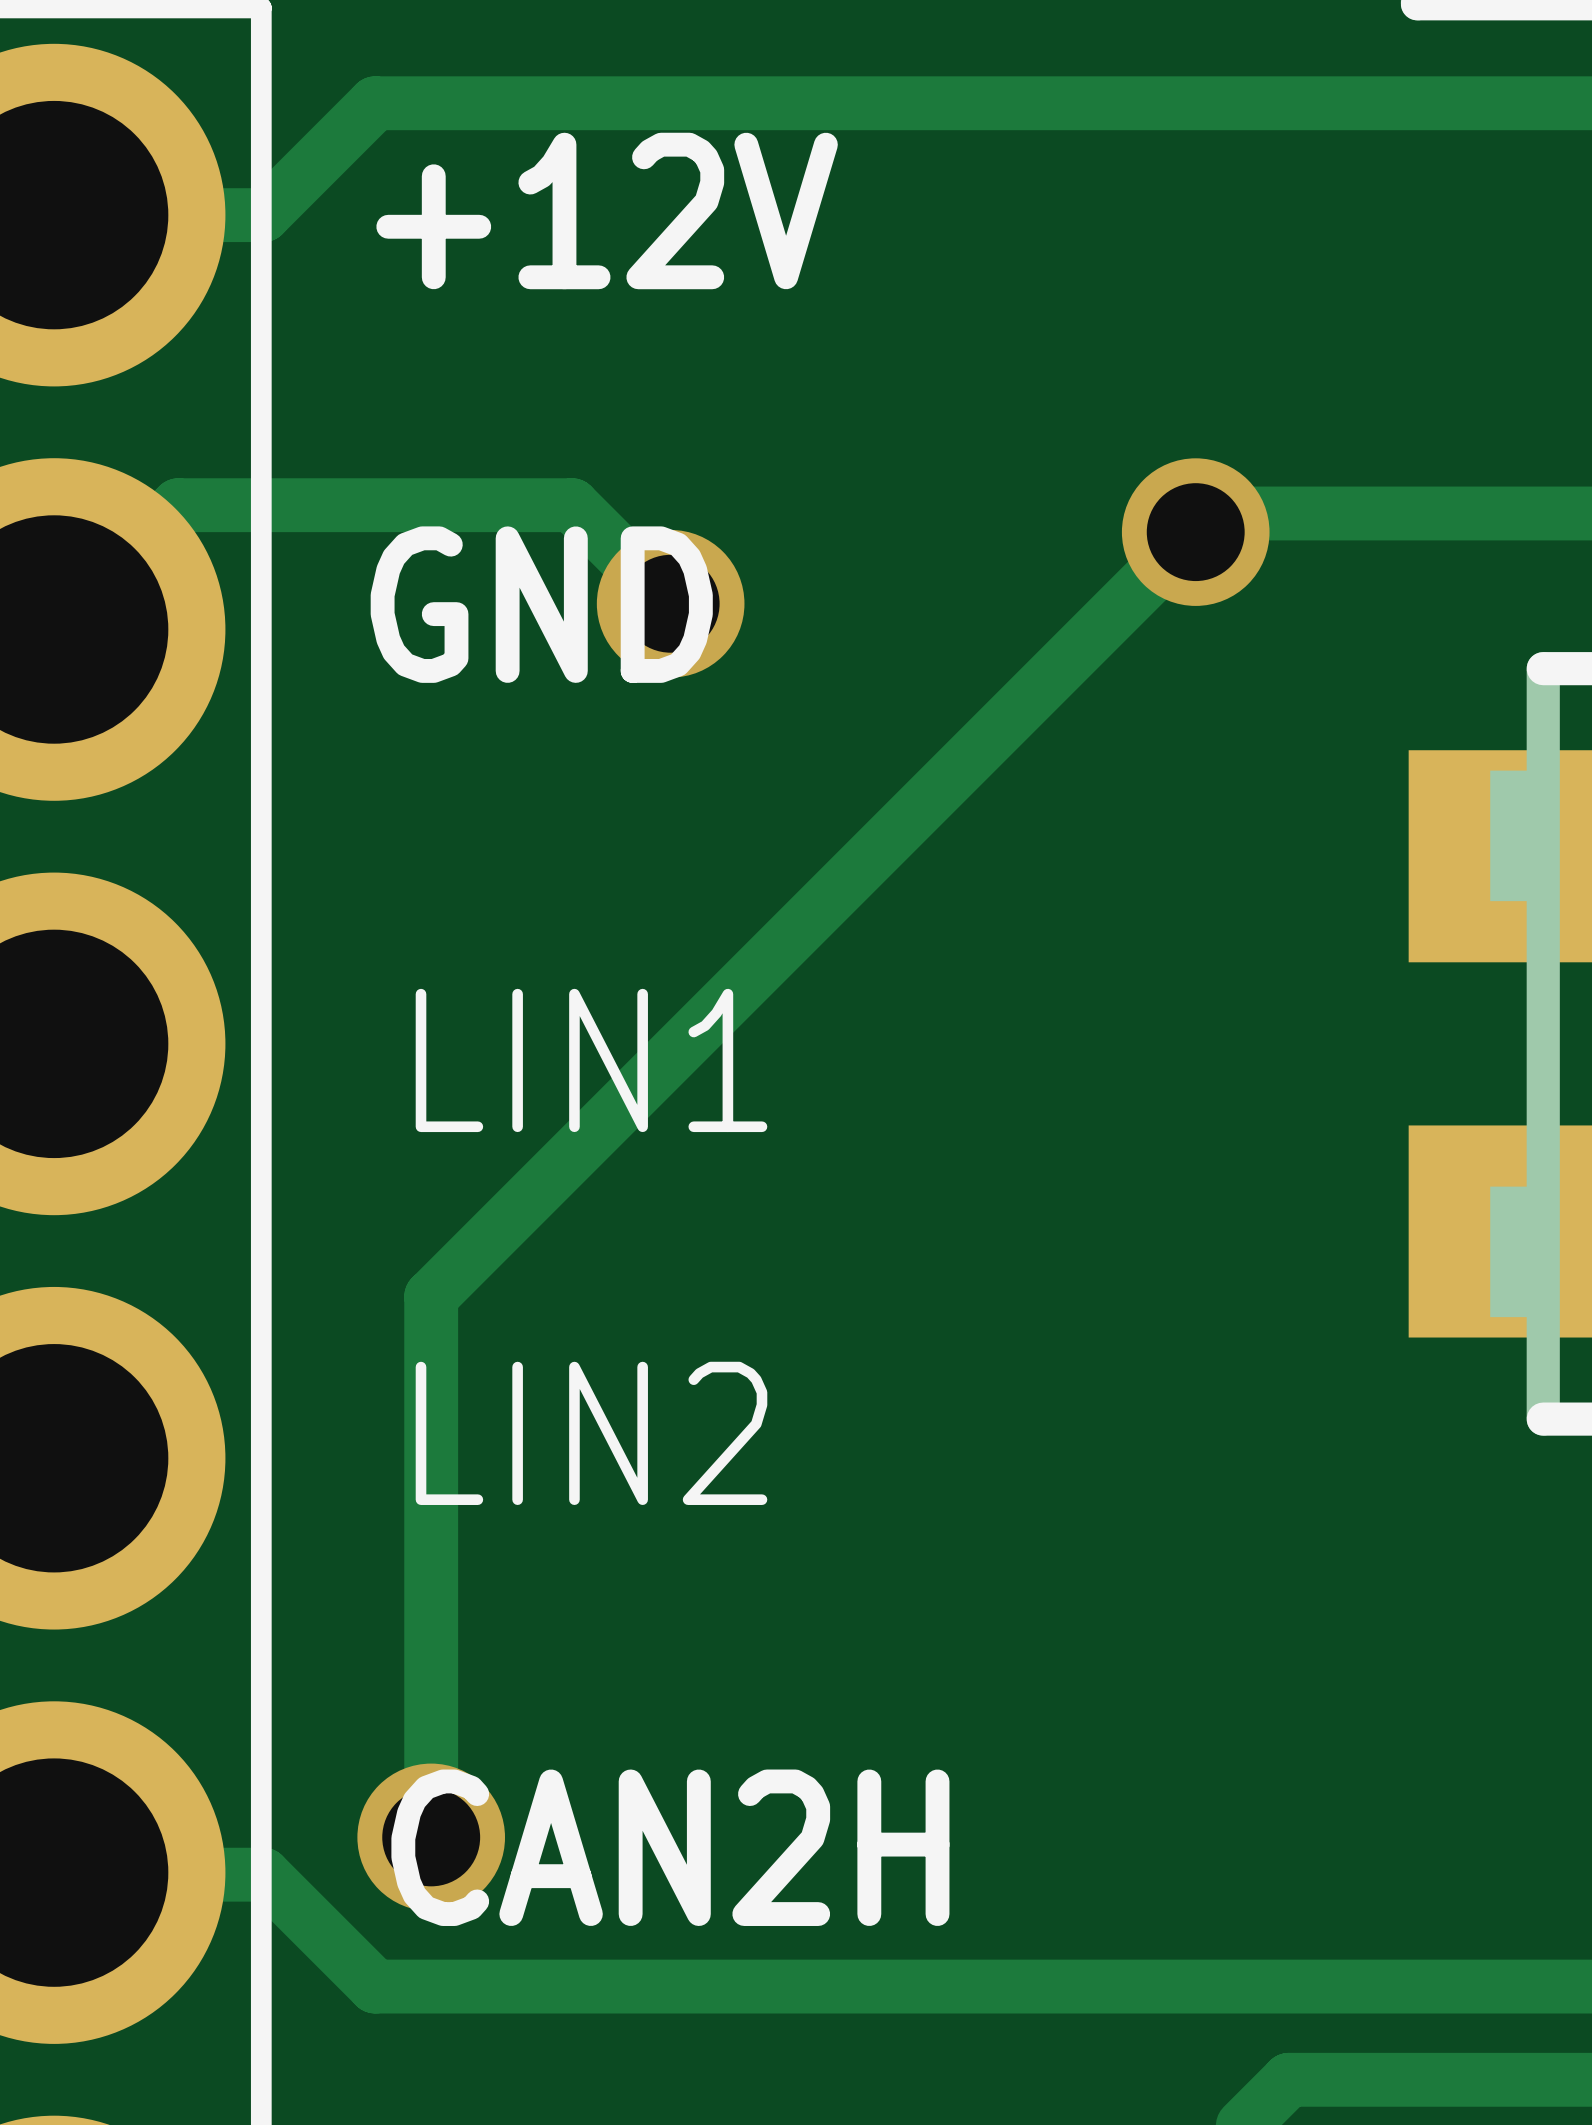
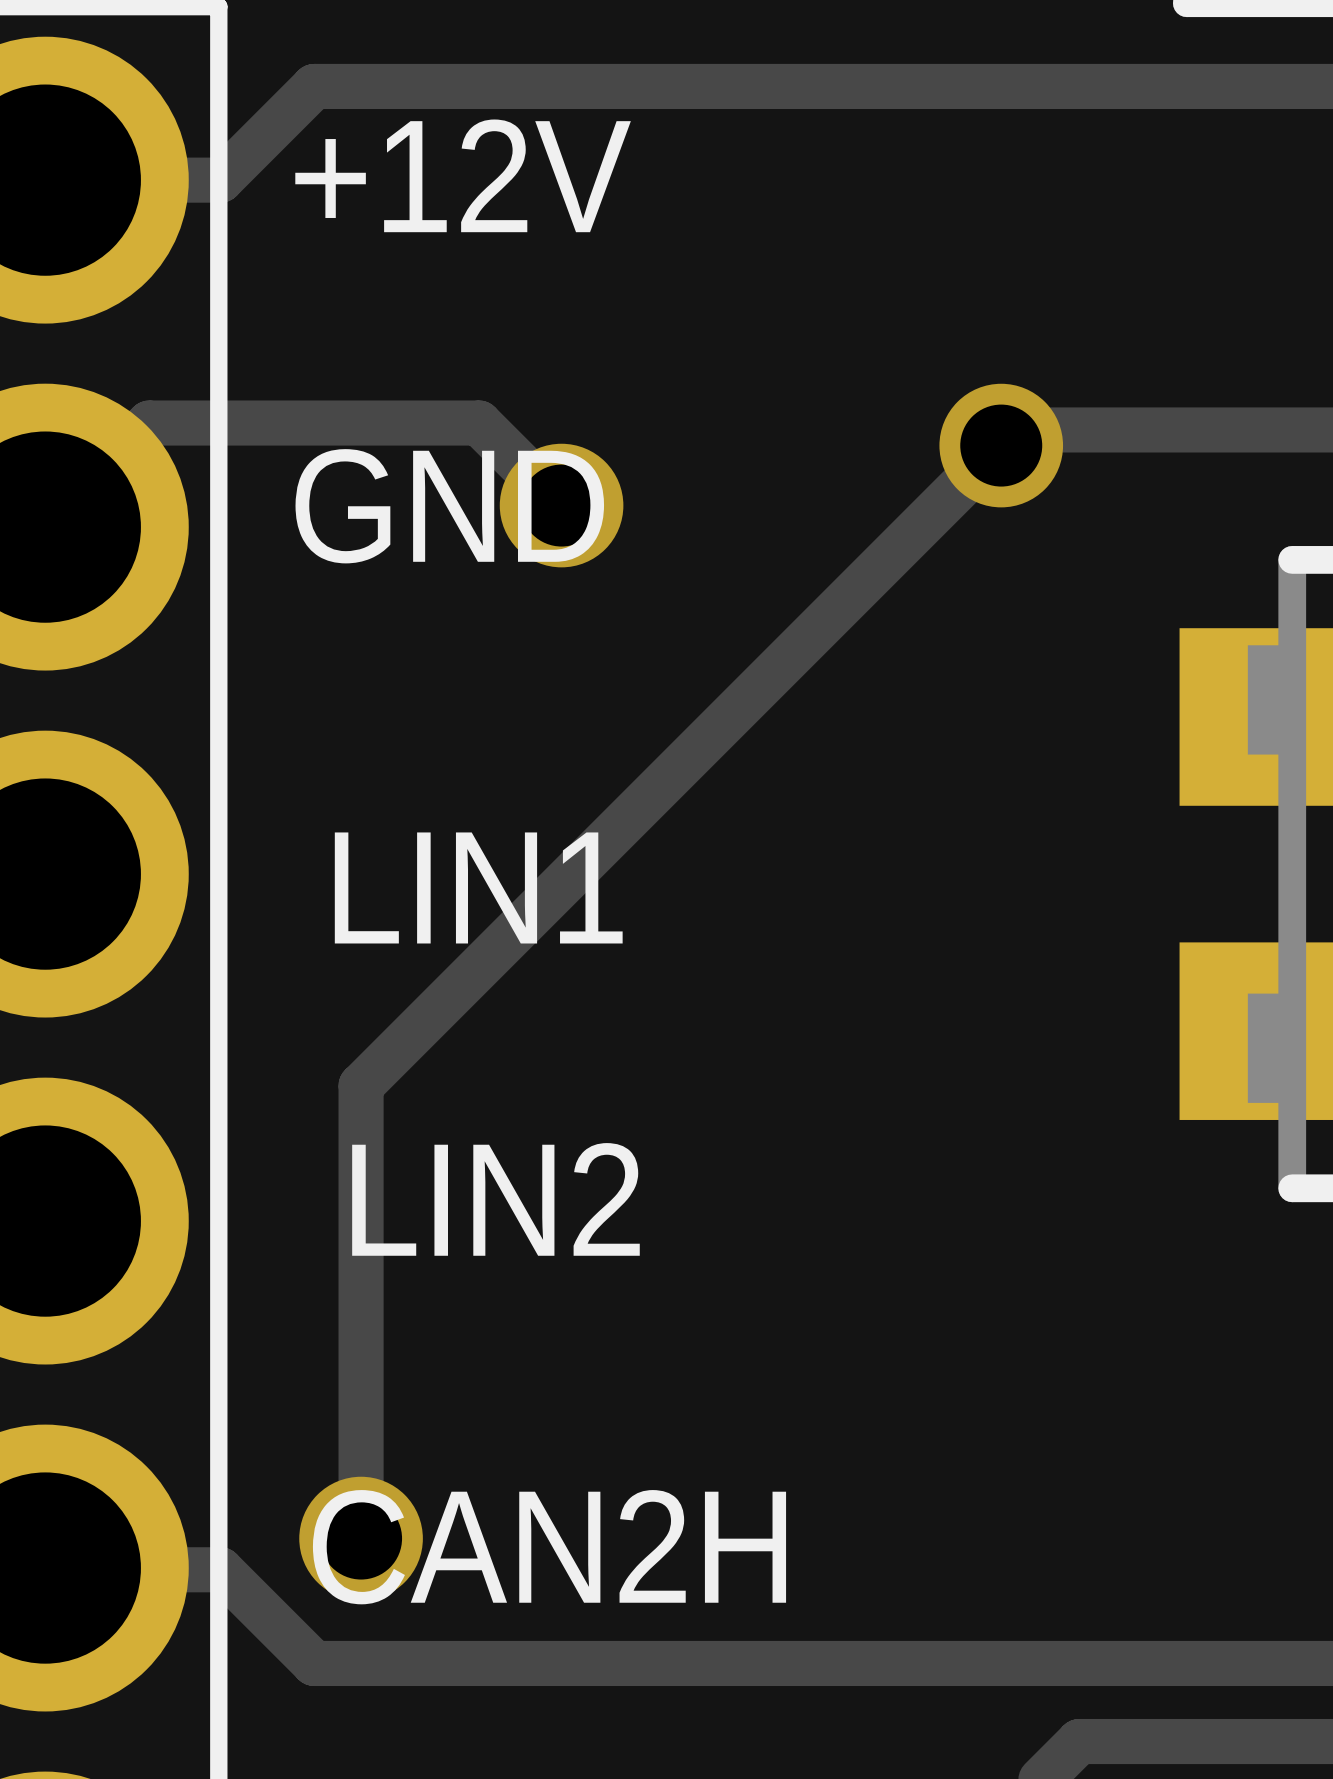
text position: LIN2 (591, 1433) -> LIN2 (495, 1199)

